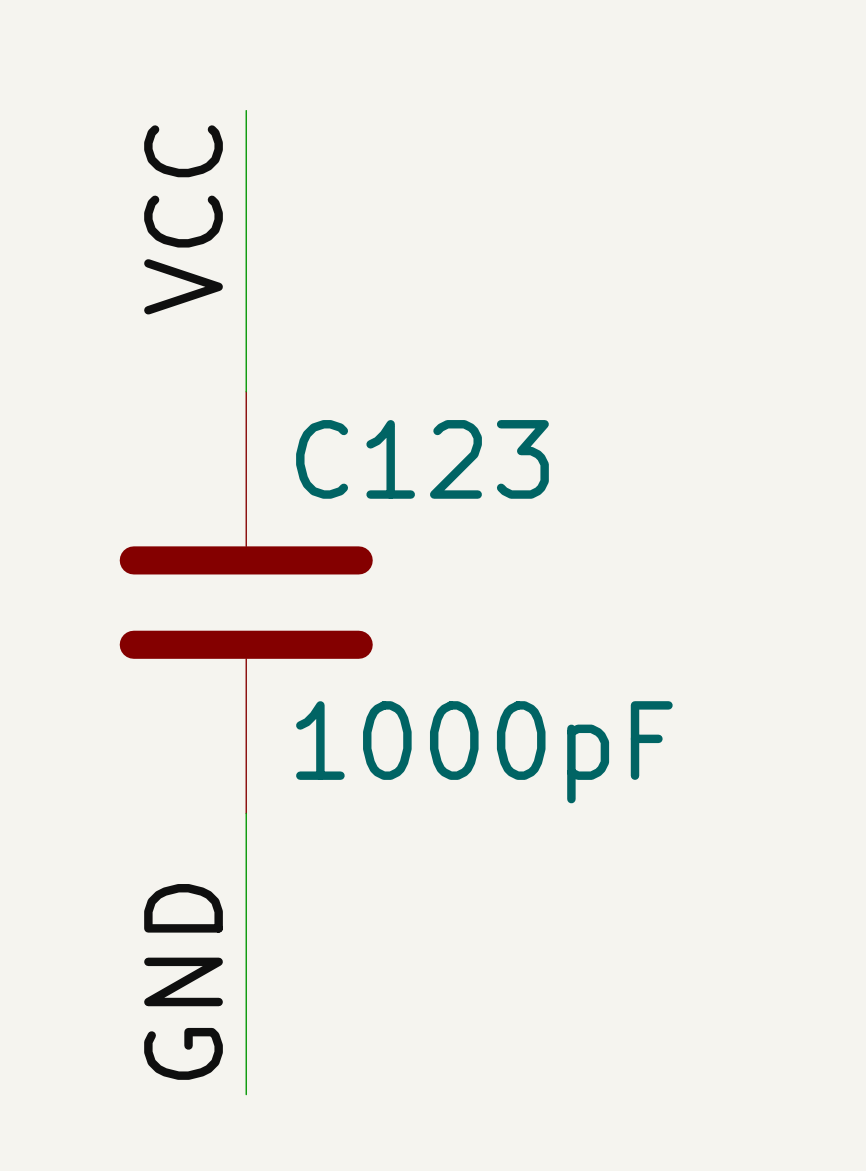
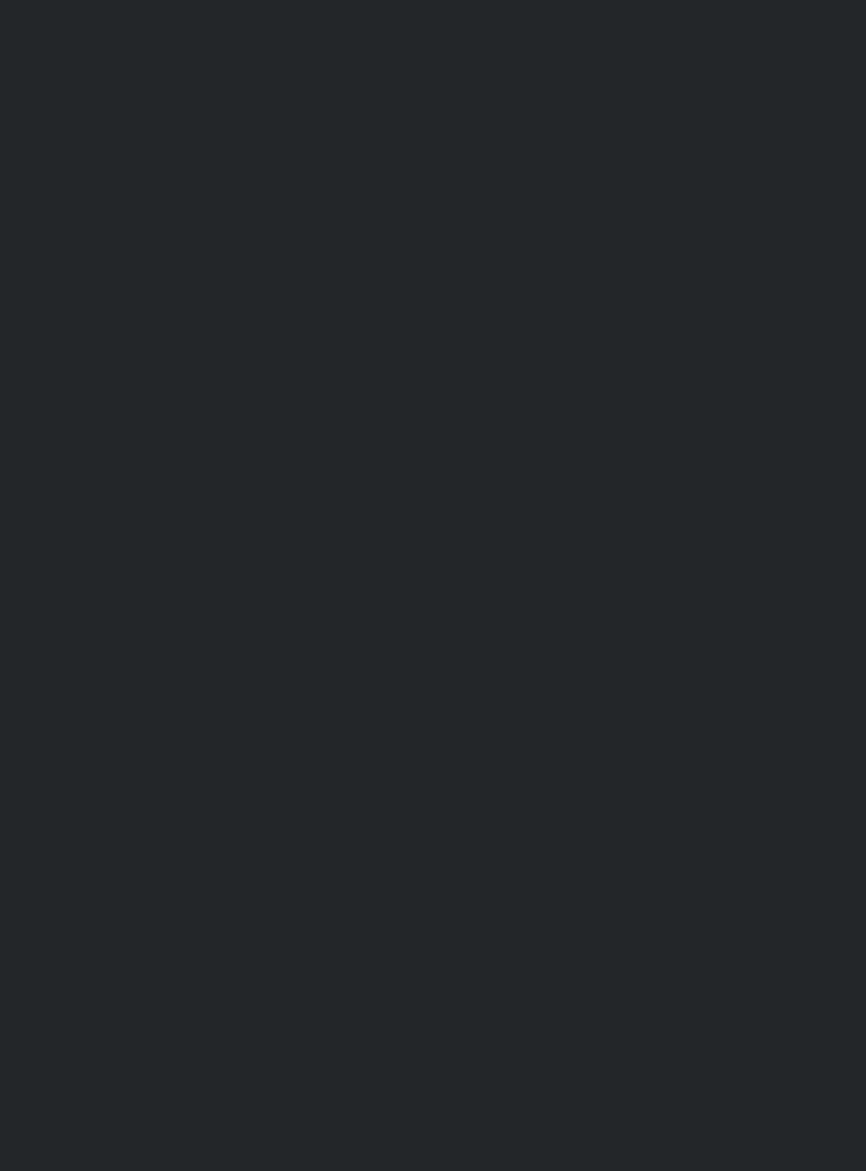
wire: (246, 110) (246, 391) -> none
label: VCC (183, 219) -> none
C123: 1000pF (246, 602) -> none
wire: (246, 813) (246, 1094) -> none
label: GND (183, 981) -> none

